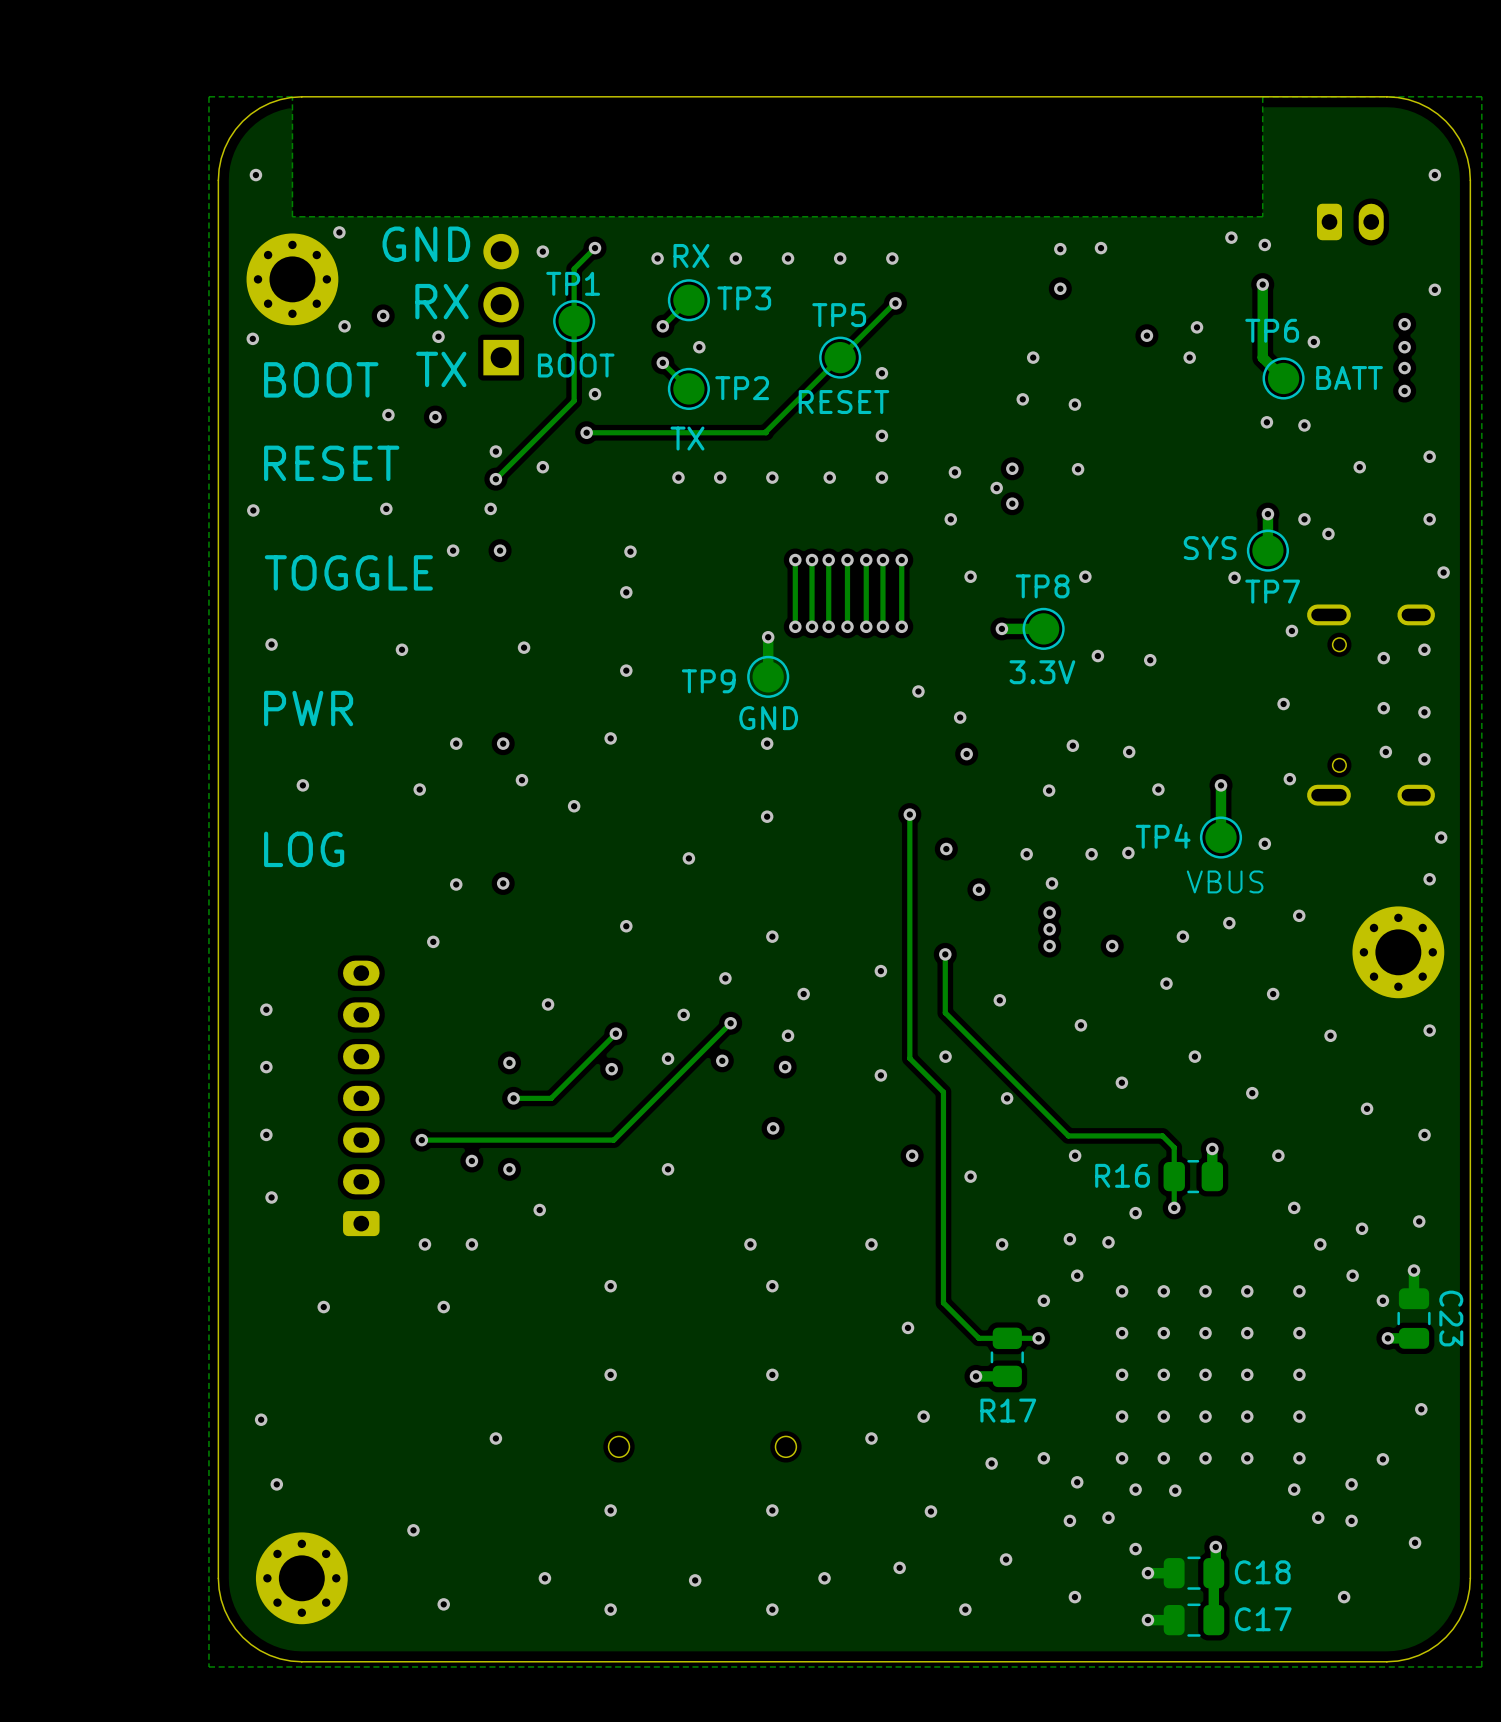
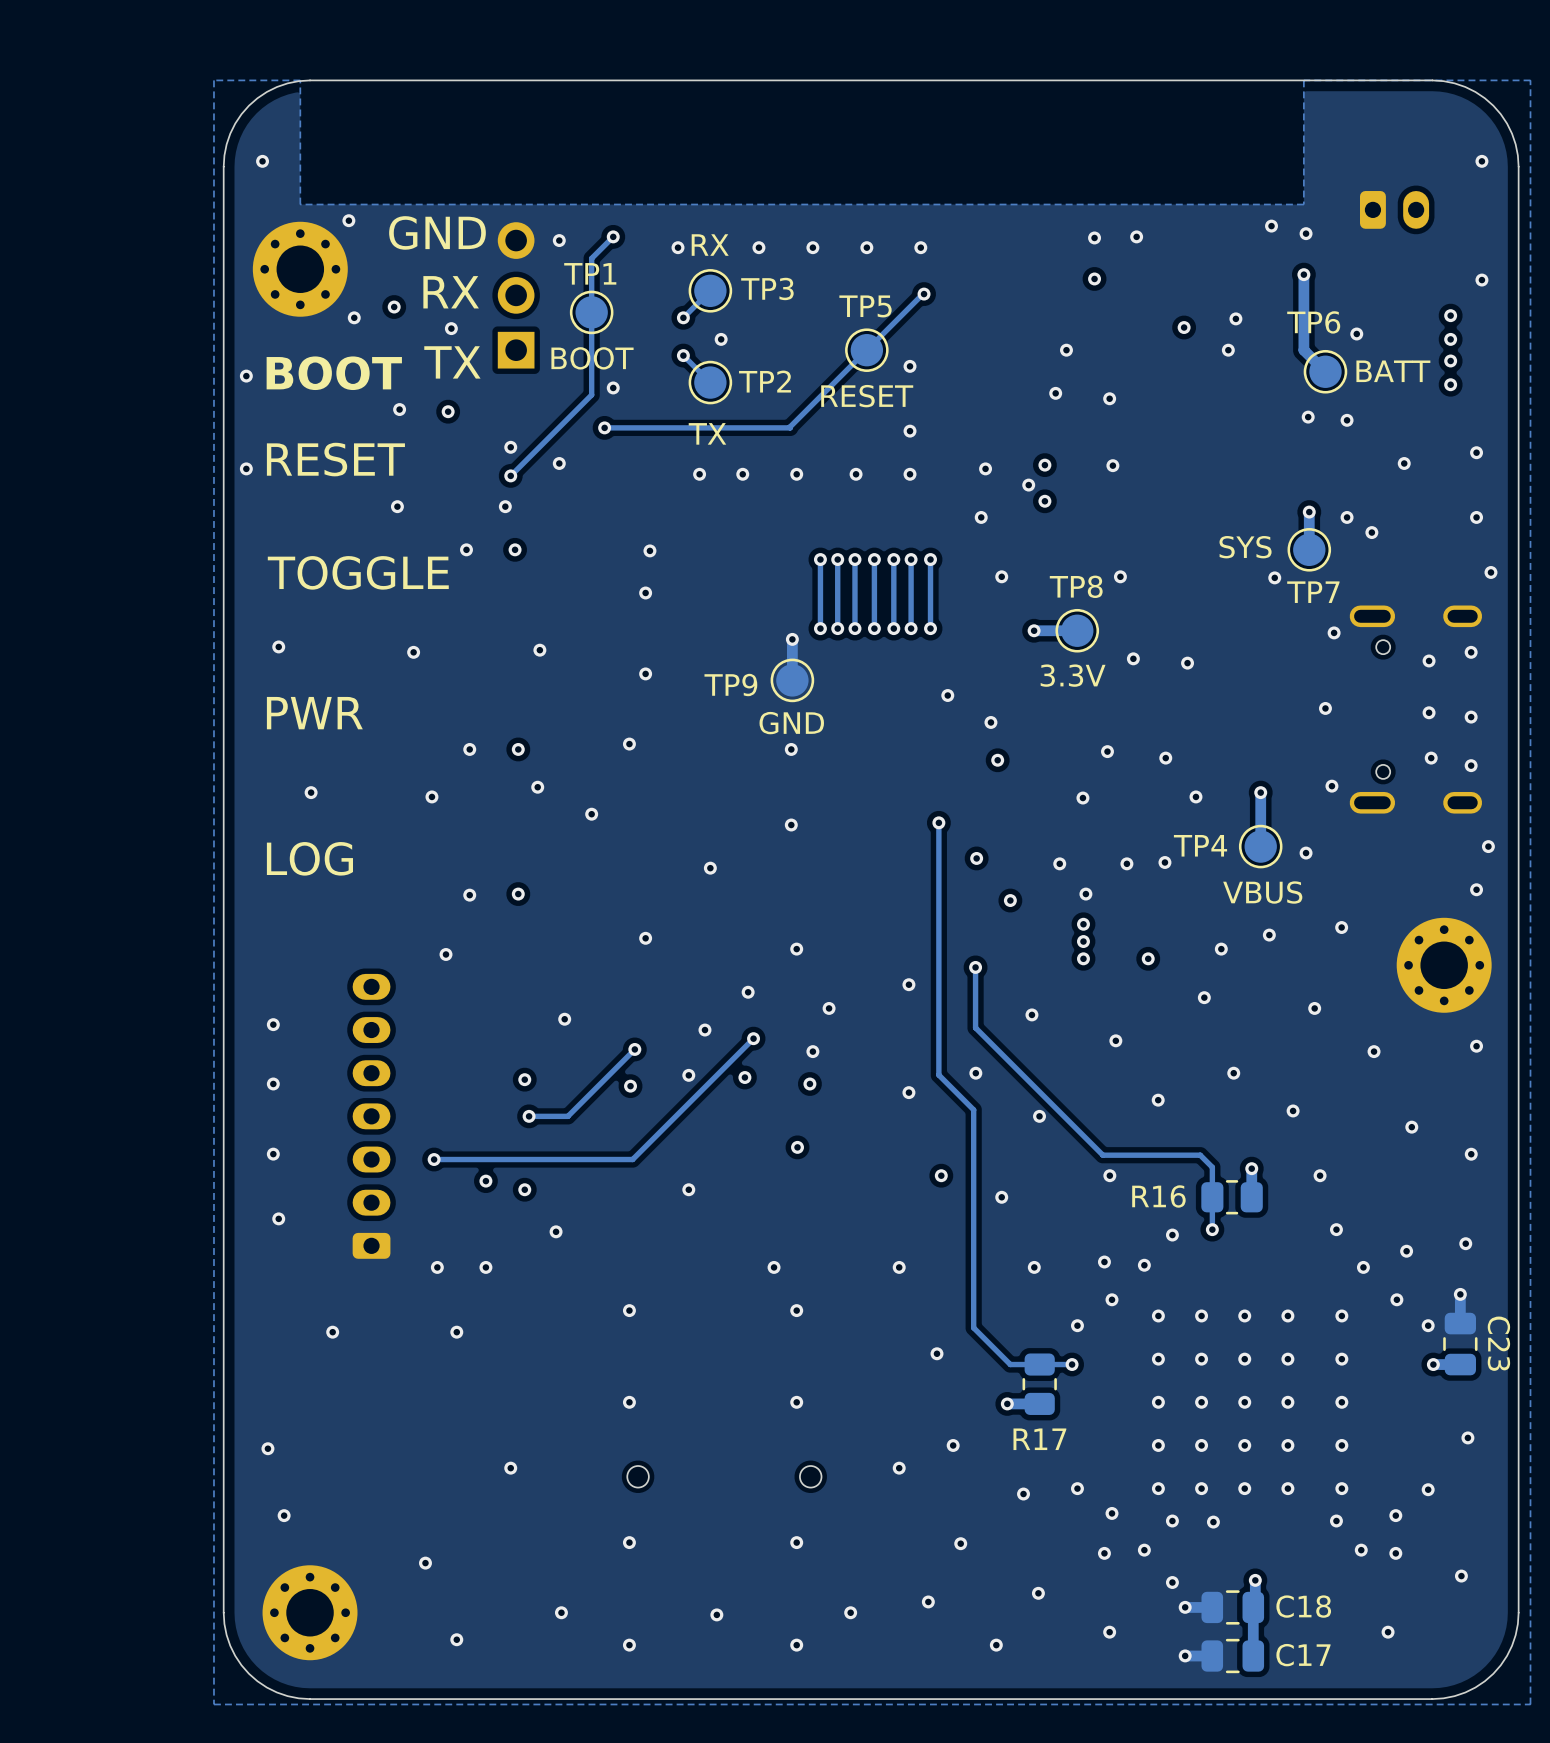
via position: (252, 338) -> (246, 376)
via position: (253, 510) -> (246, 468)

